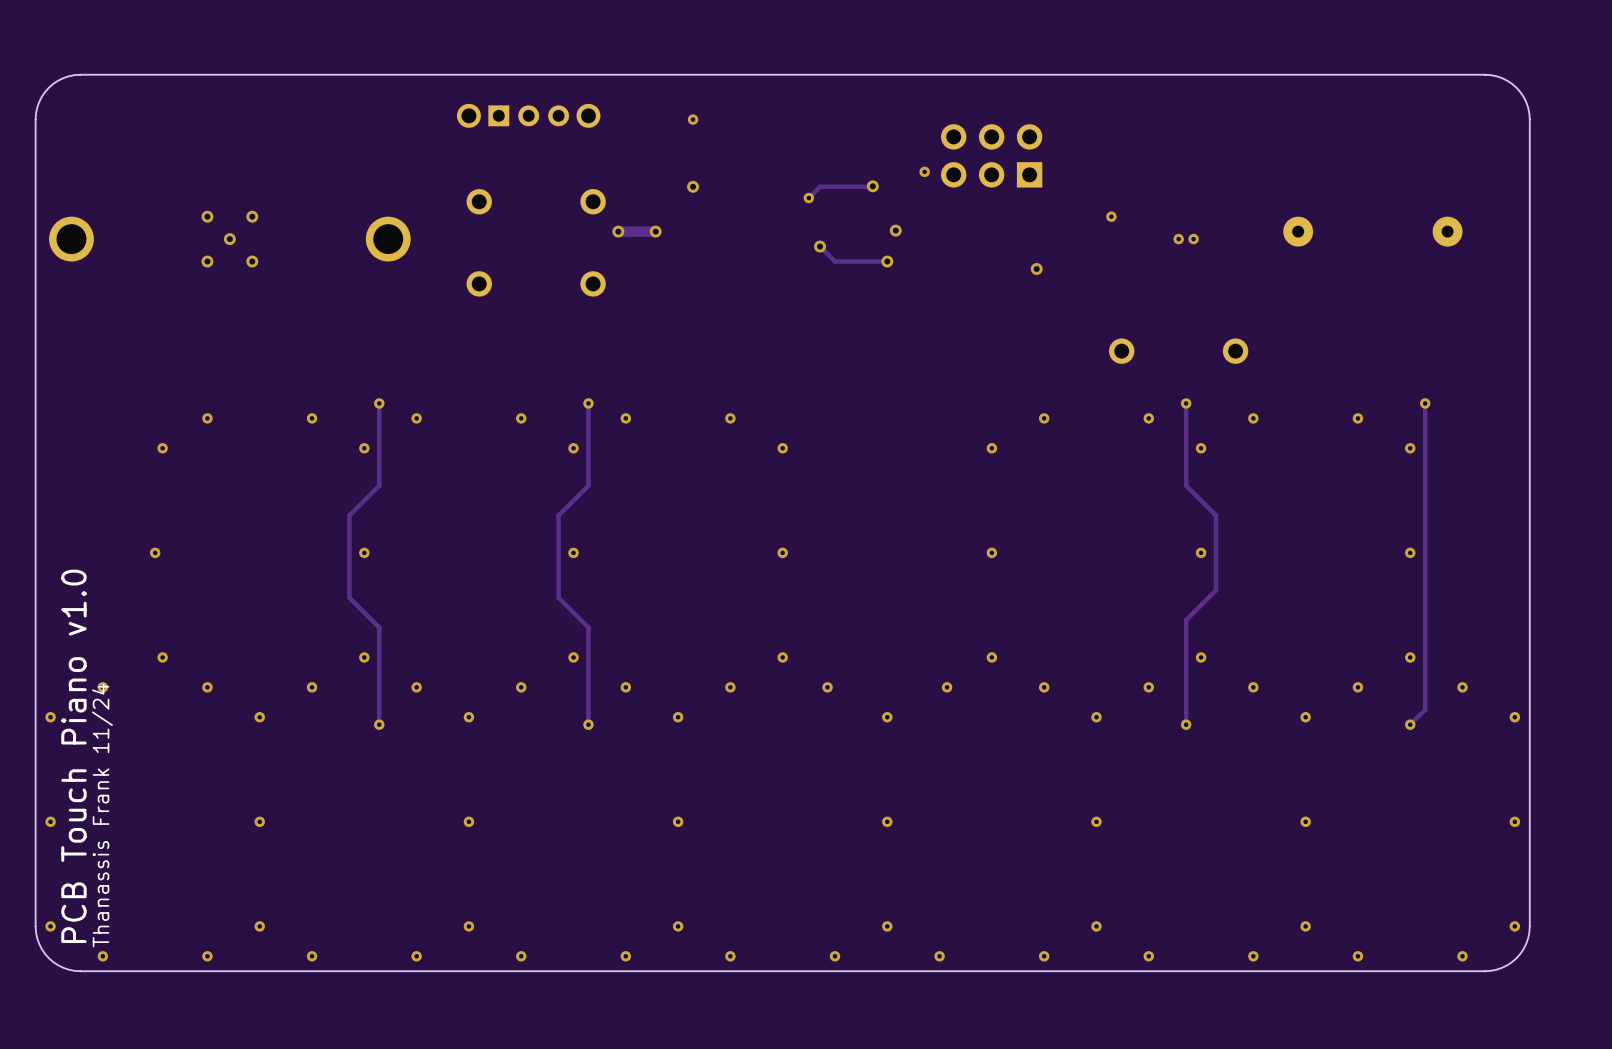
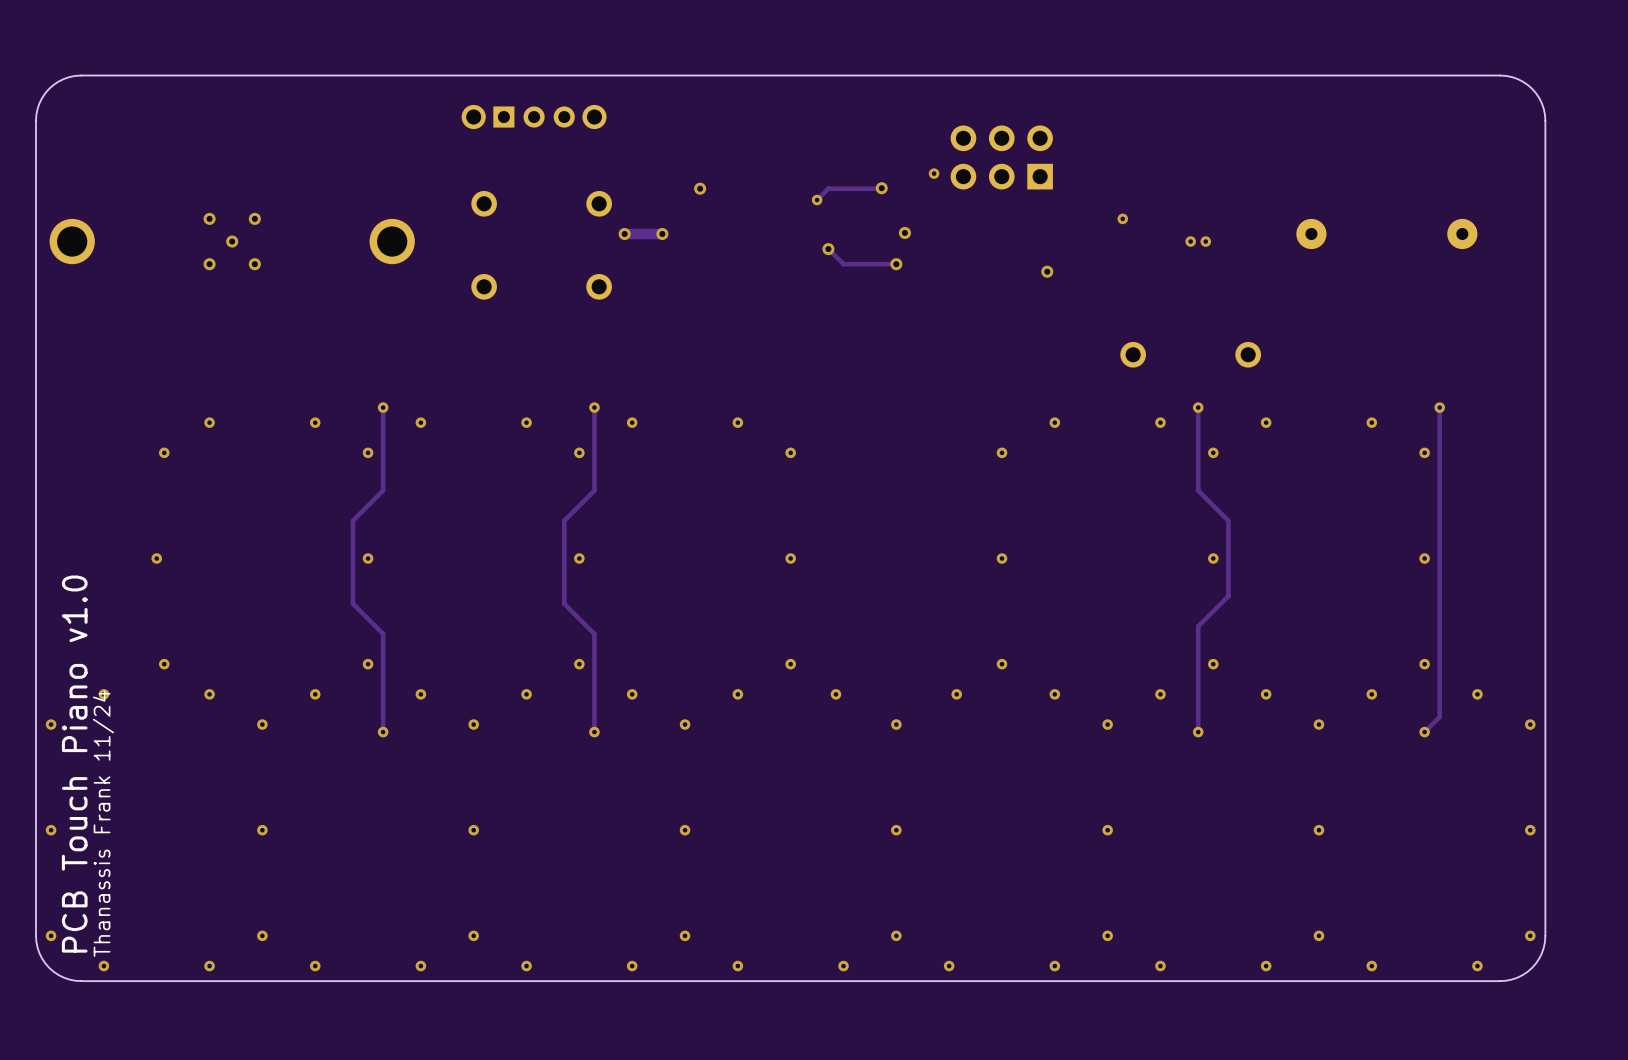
via: (693, 119) -> none

